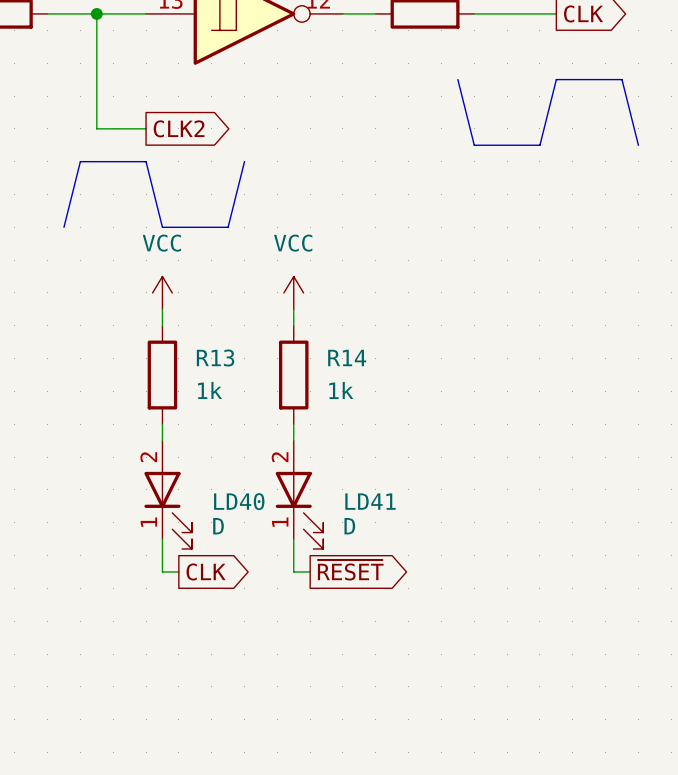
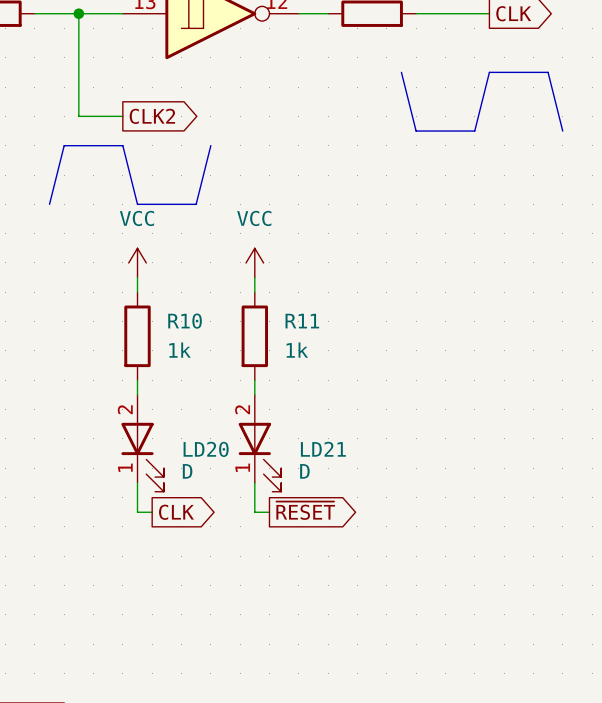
R14 name: R14 (347, 357) -> R11 (302, 321)
R13 name: R13 (215, 358) -> R10 (185, 321)
LD40 name: LD40 (239, 501) -> LD20 (206, 449)
LD41 name: LD41 (370, 501) -> LD21 (323, 449)

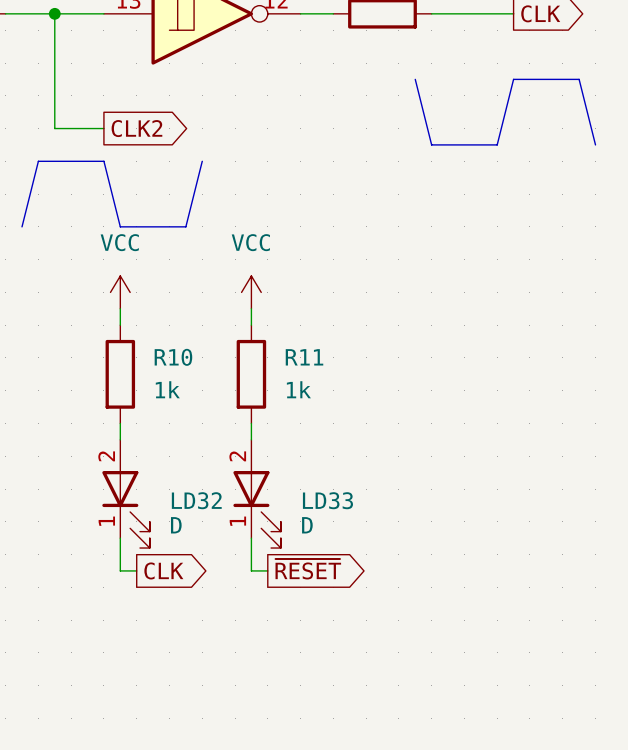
LD20 name: LD20 (206, 449) -> LD32 (196, 500)
LD21 name: LD21 (323, 449) -> LD33 (327, 500)

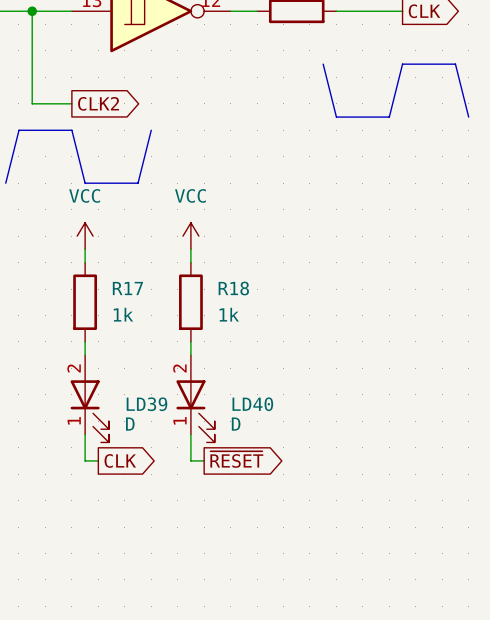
R10 name: R10 (173, 357) -> R17 (127, 288)
R11 name: R11 (304, 357) -> R18 (233, 288)
LD32 name: LD32 (196, 500) -> LD39 (146, 404)
LD33 name: LD33 (327, 500) -> LD40 (252, 404)

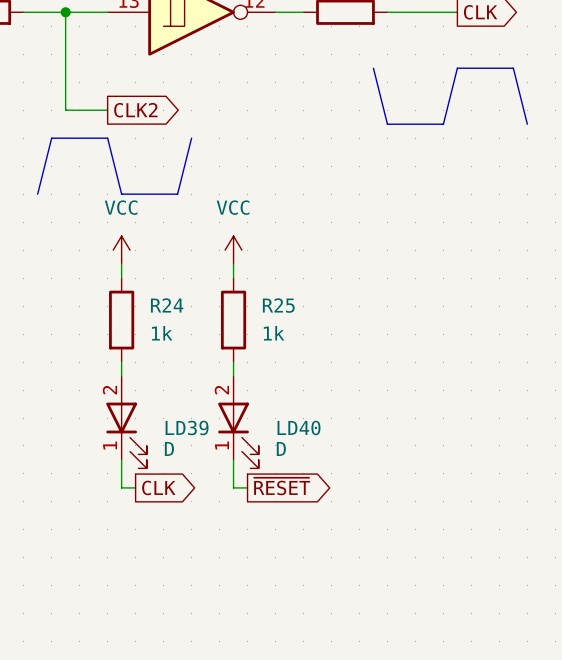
R17 name: R17 (127, 288) -> R24 (167, 305)
R18 name: R18 (233, 288) -> R25 (278, 305)

